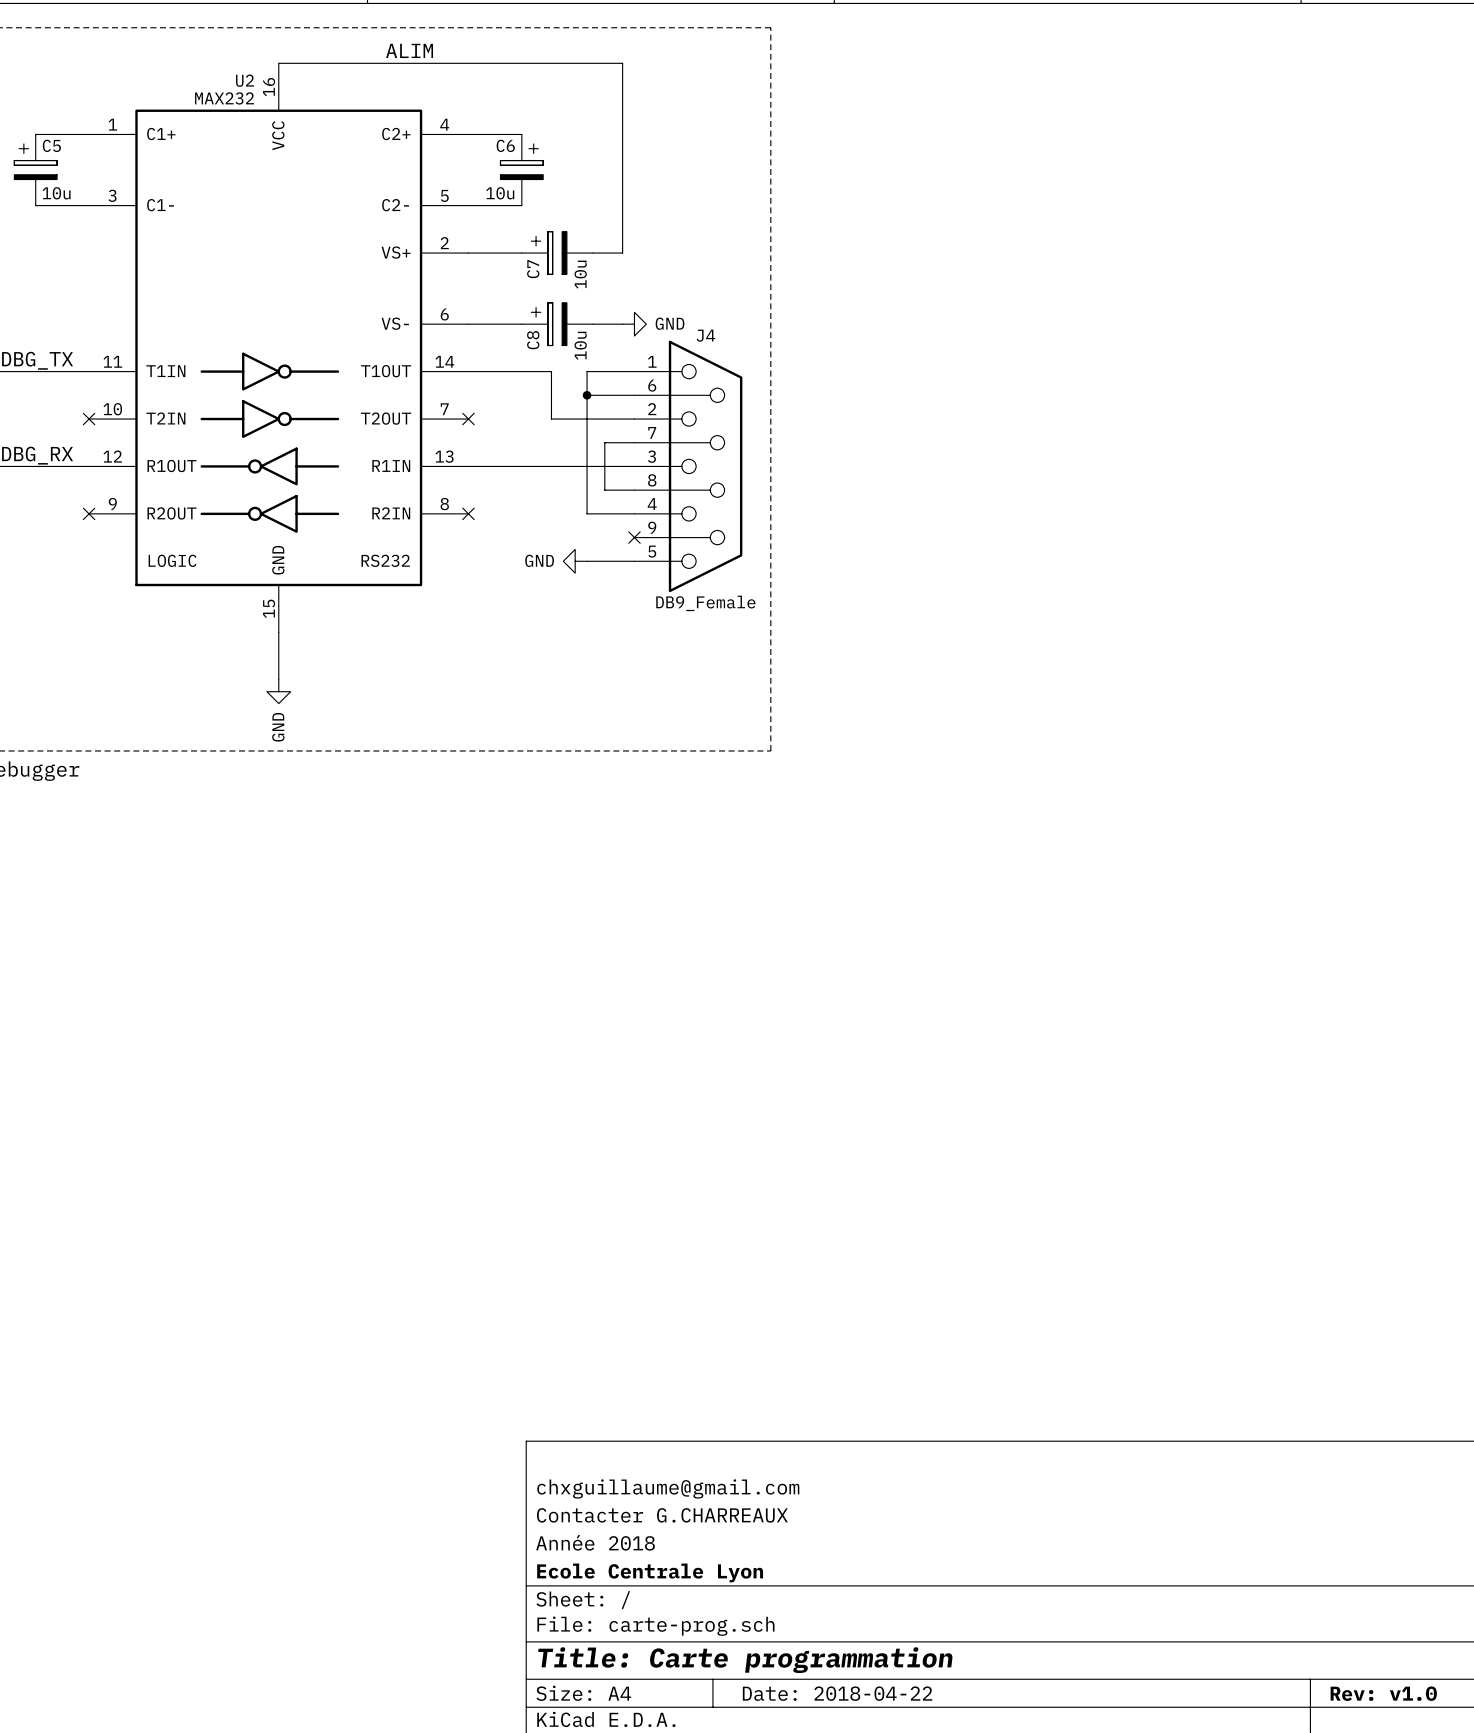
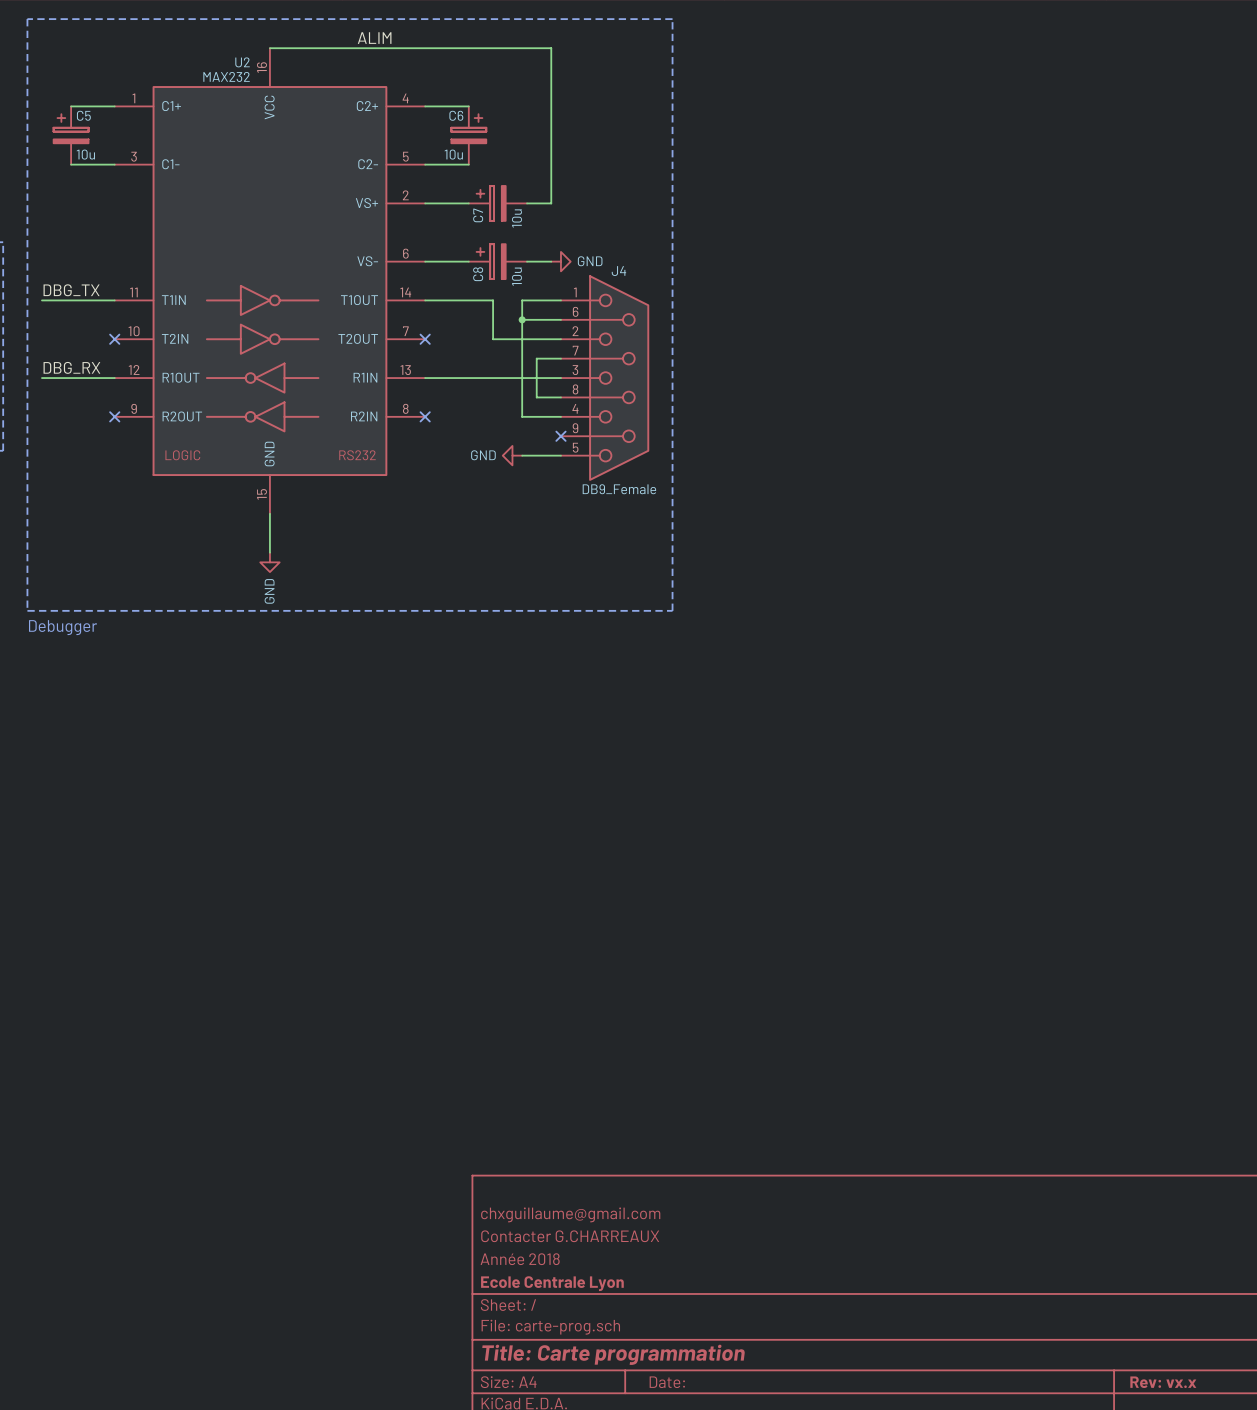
title block: Date: 2018-04-22 (837, 1693) -> Date: (667, 1382)
title block: Rev: v1.0 (1383, 1693) -> Rev: vx.x (1163, 1382)

